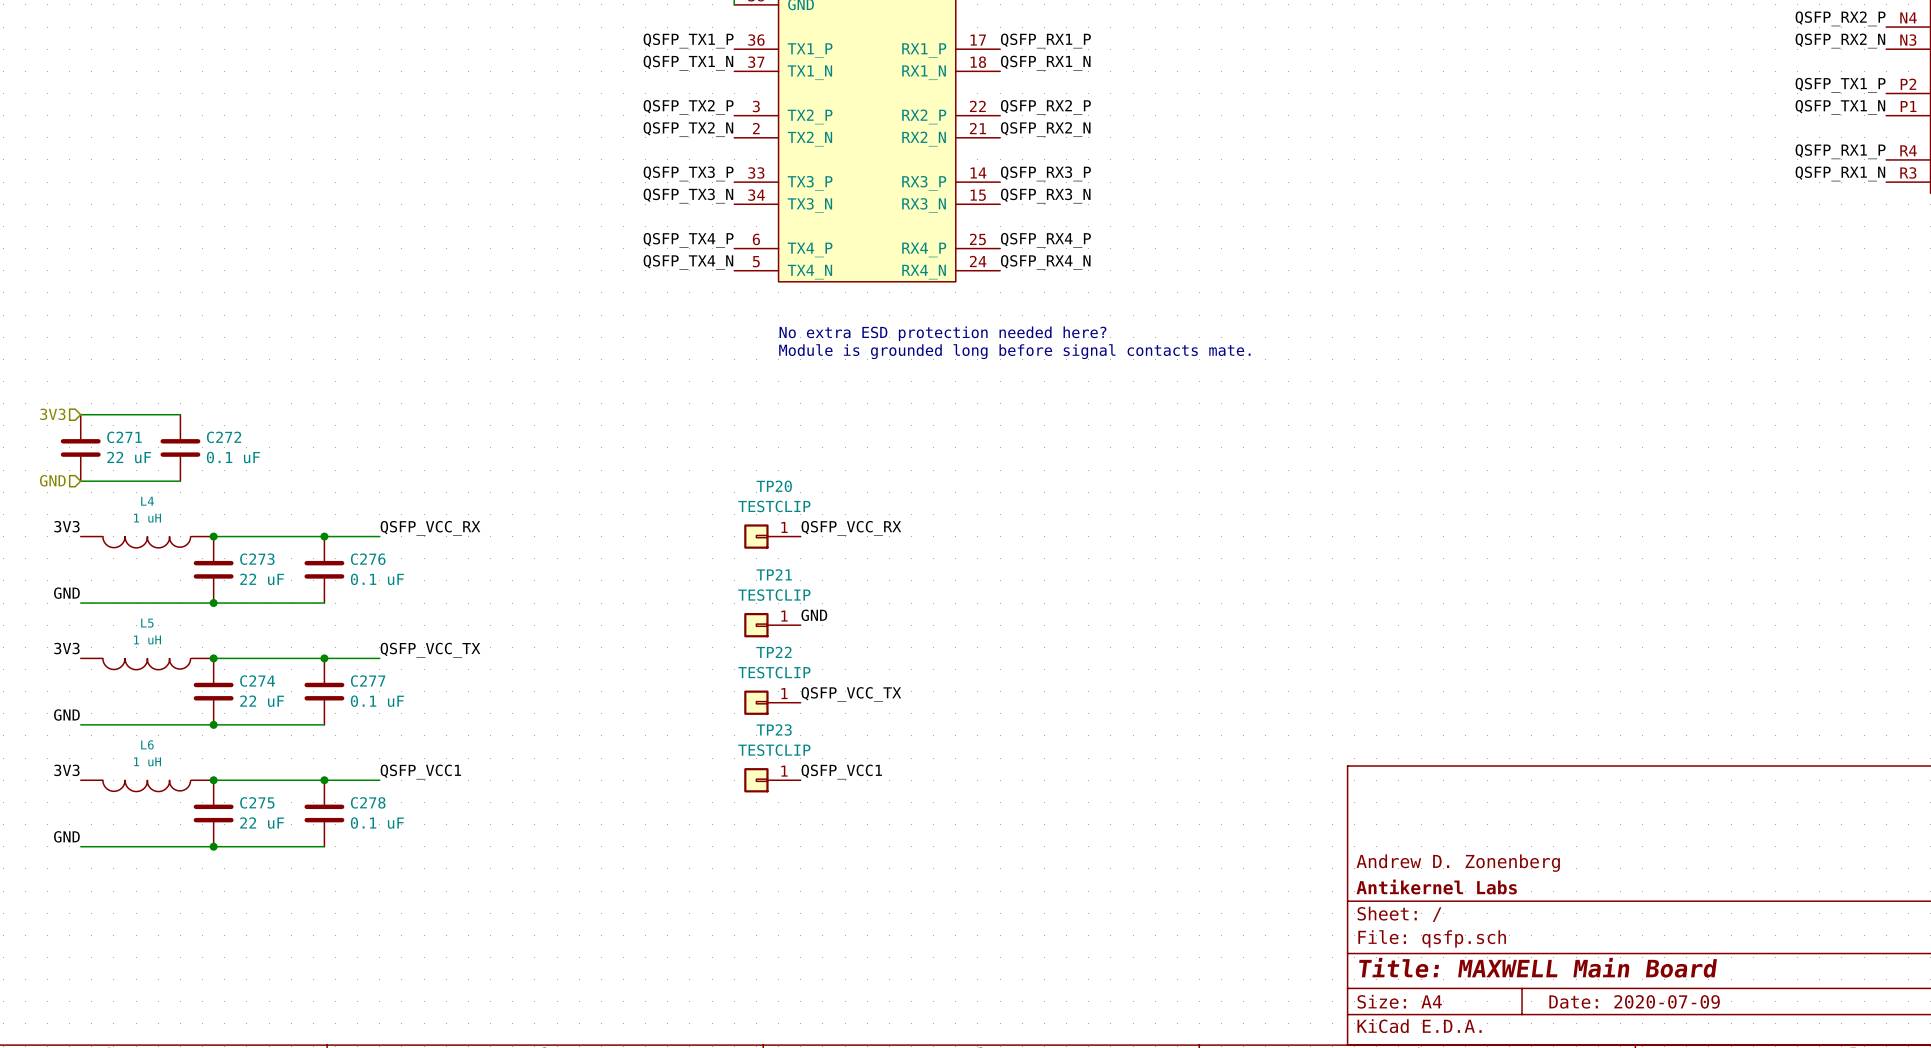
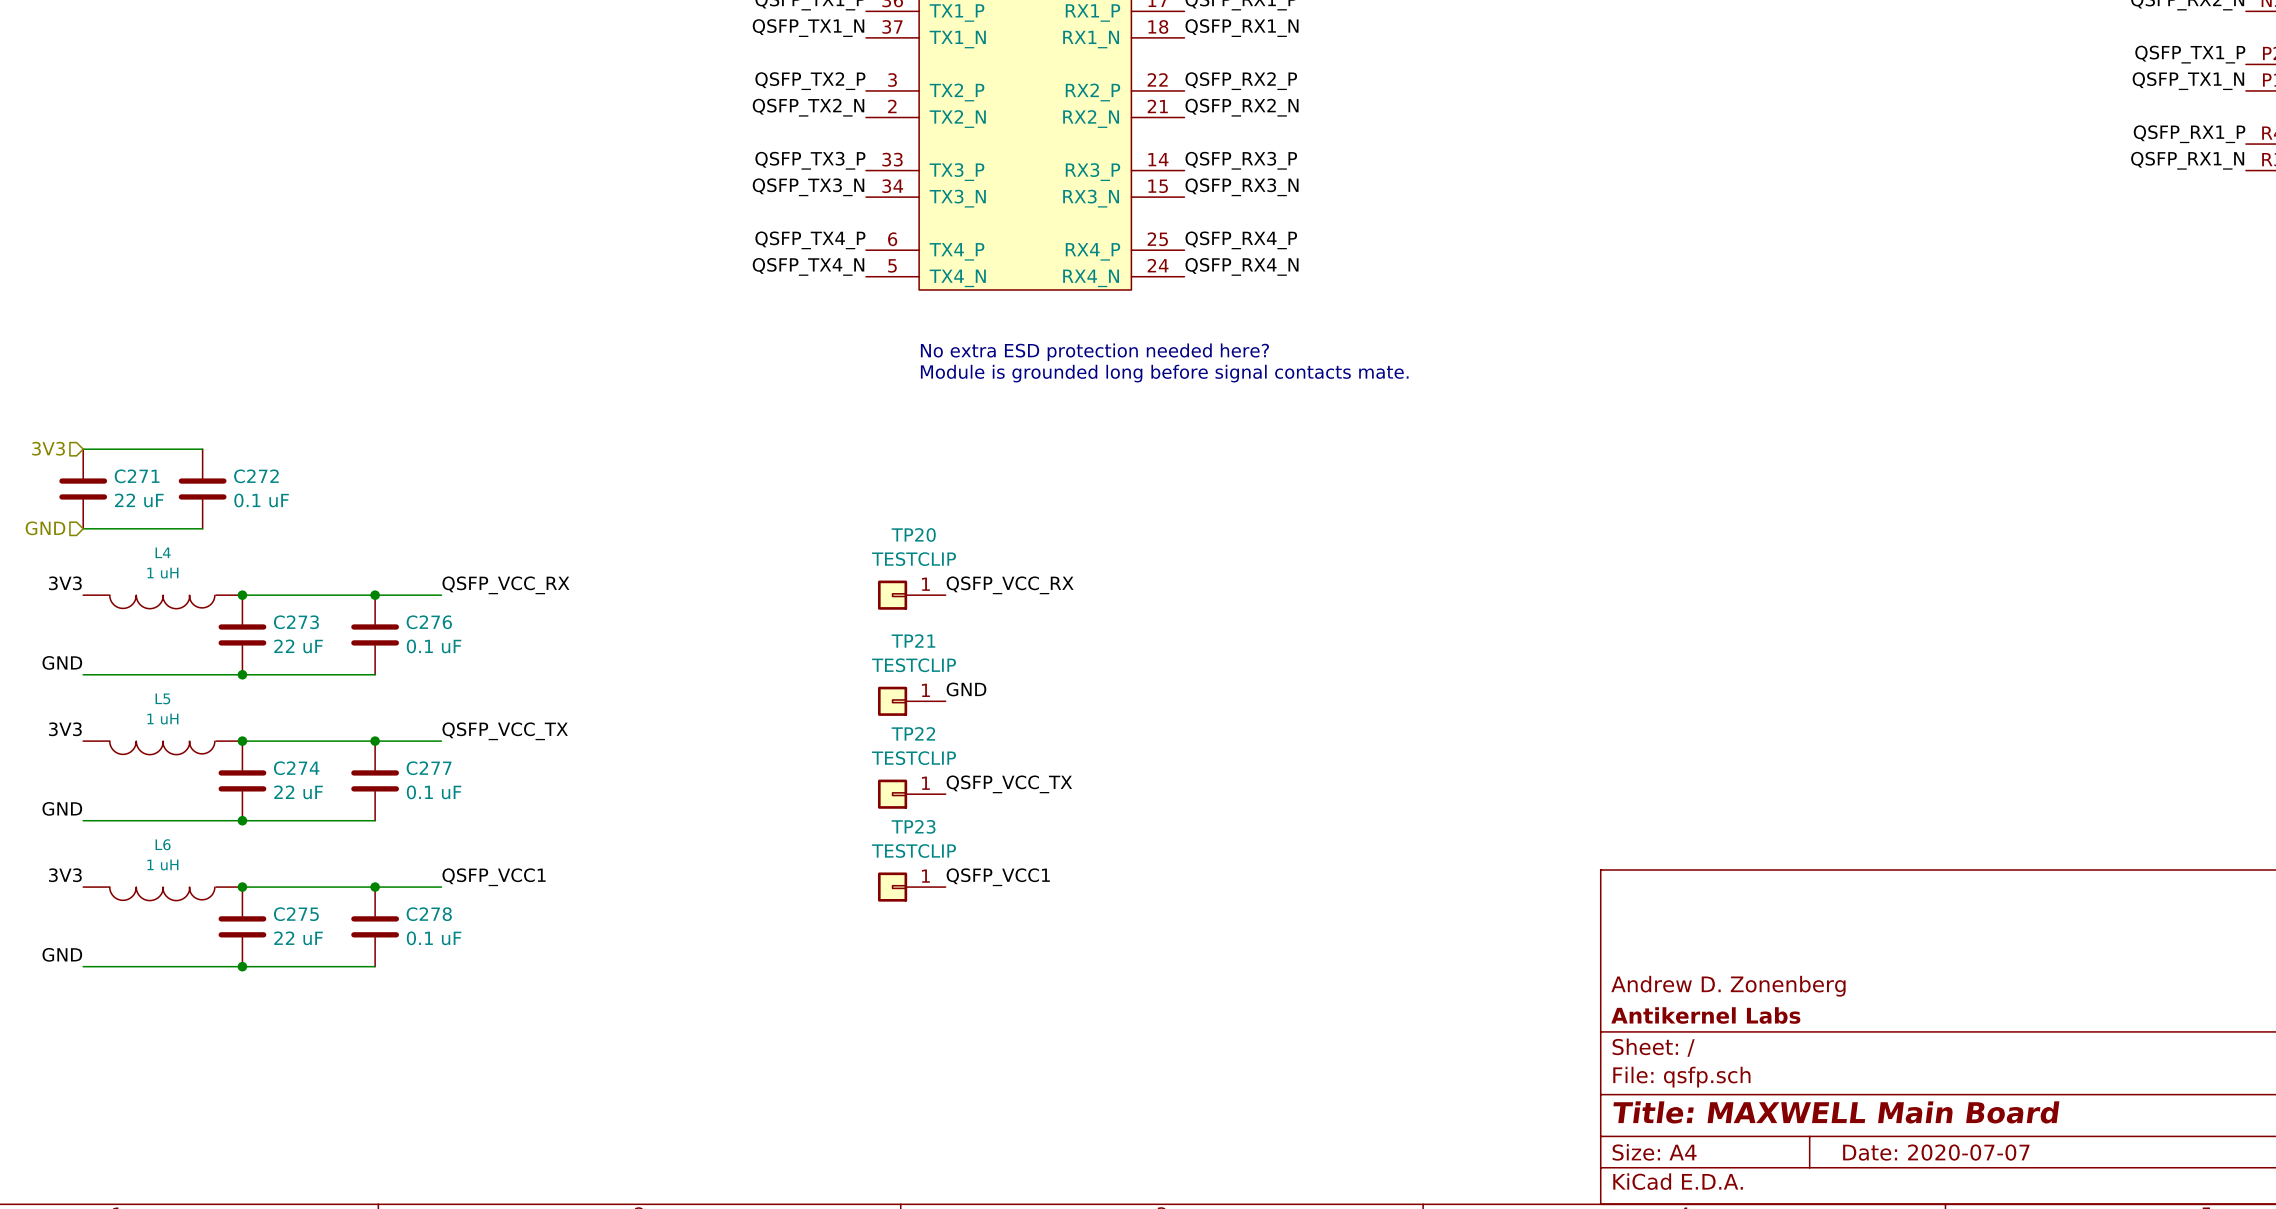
title block: Date: 2020-07-09 (1634, 1001) -> Date: 2020-07-07 (1936, 1152)

